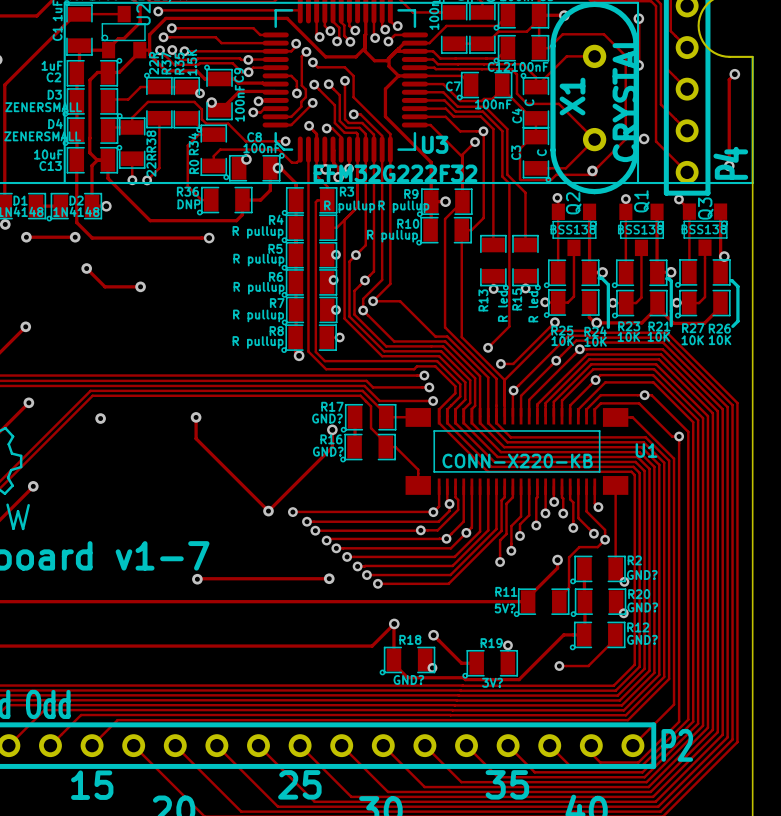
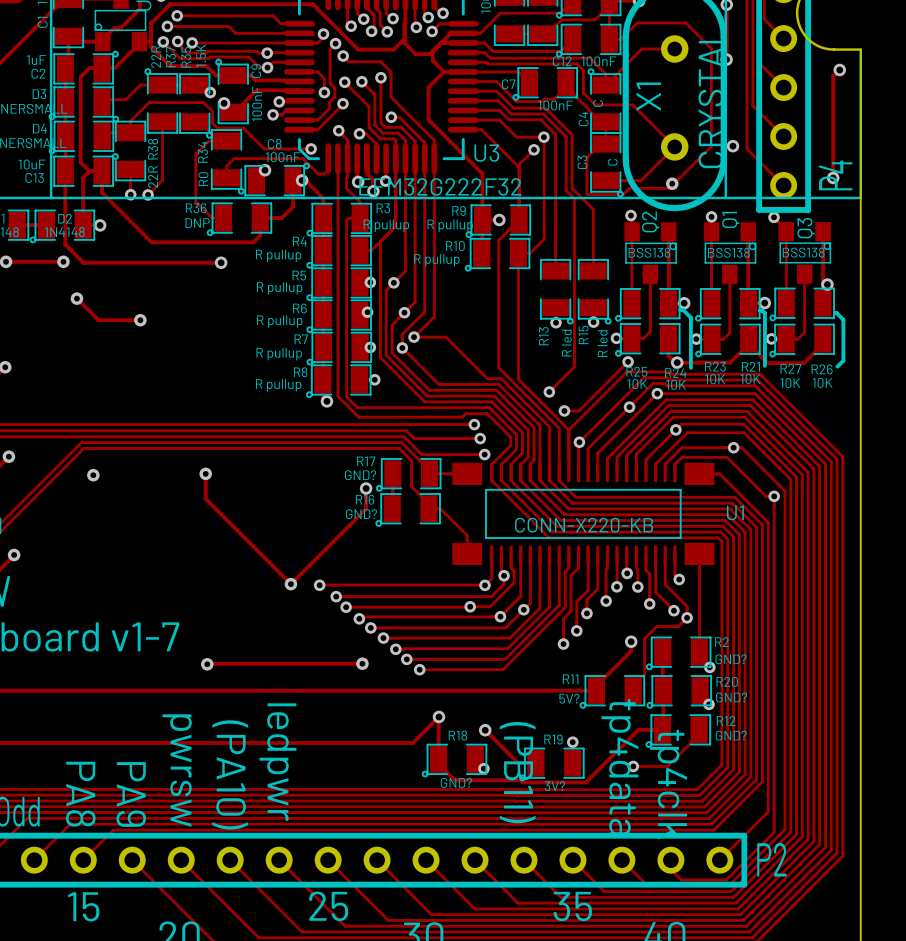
text: none -> ledpwr (277, 762)
text: none -> tp4data (619, 767)
text: none -> pwrsw (177, 770)
text: none -> (PB11) (517, 772)
text: none -> (PA10) (230, 774)
text: none -> tp4clk (668, 784)
text: none -> PA8 (80, 794)
text: none -> PA9 (131, 794)

